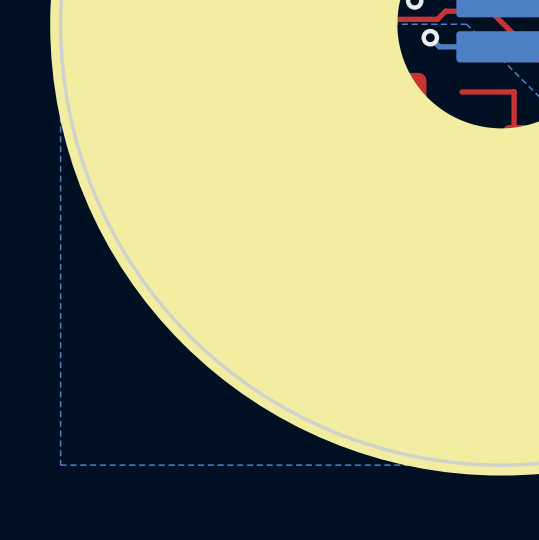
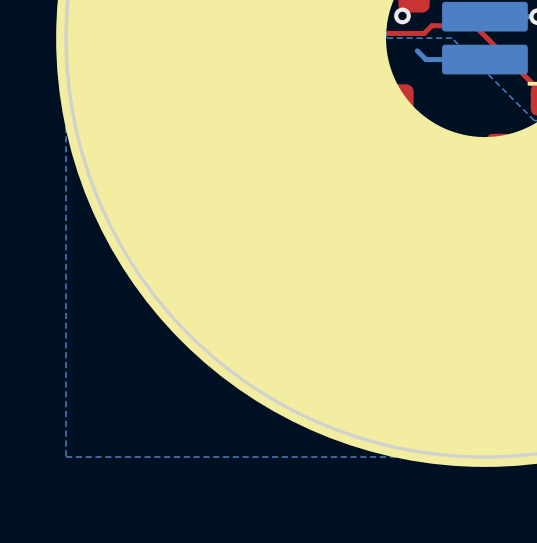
via: (430, 37) -> none
top track: (462, 91) (514, 91) (514, 138) -> none

